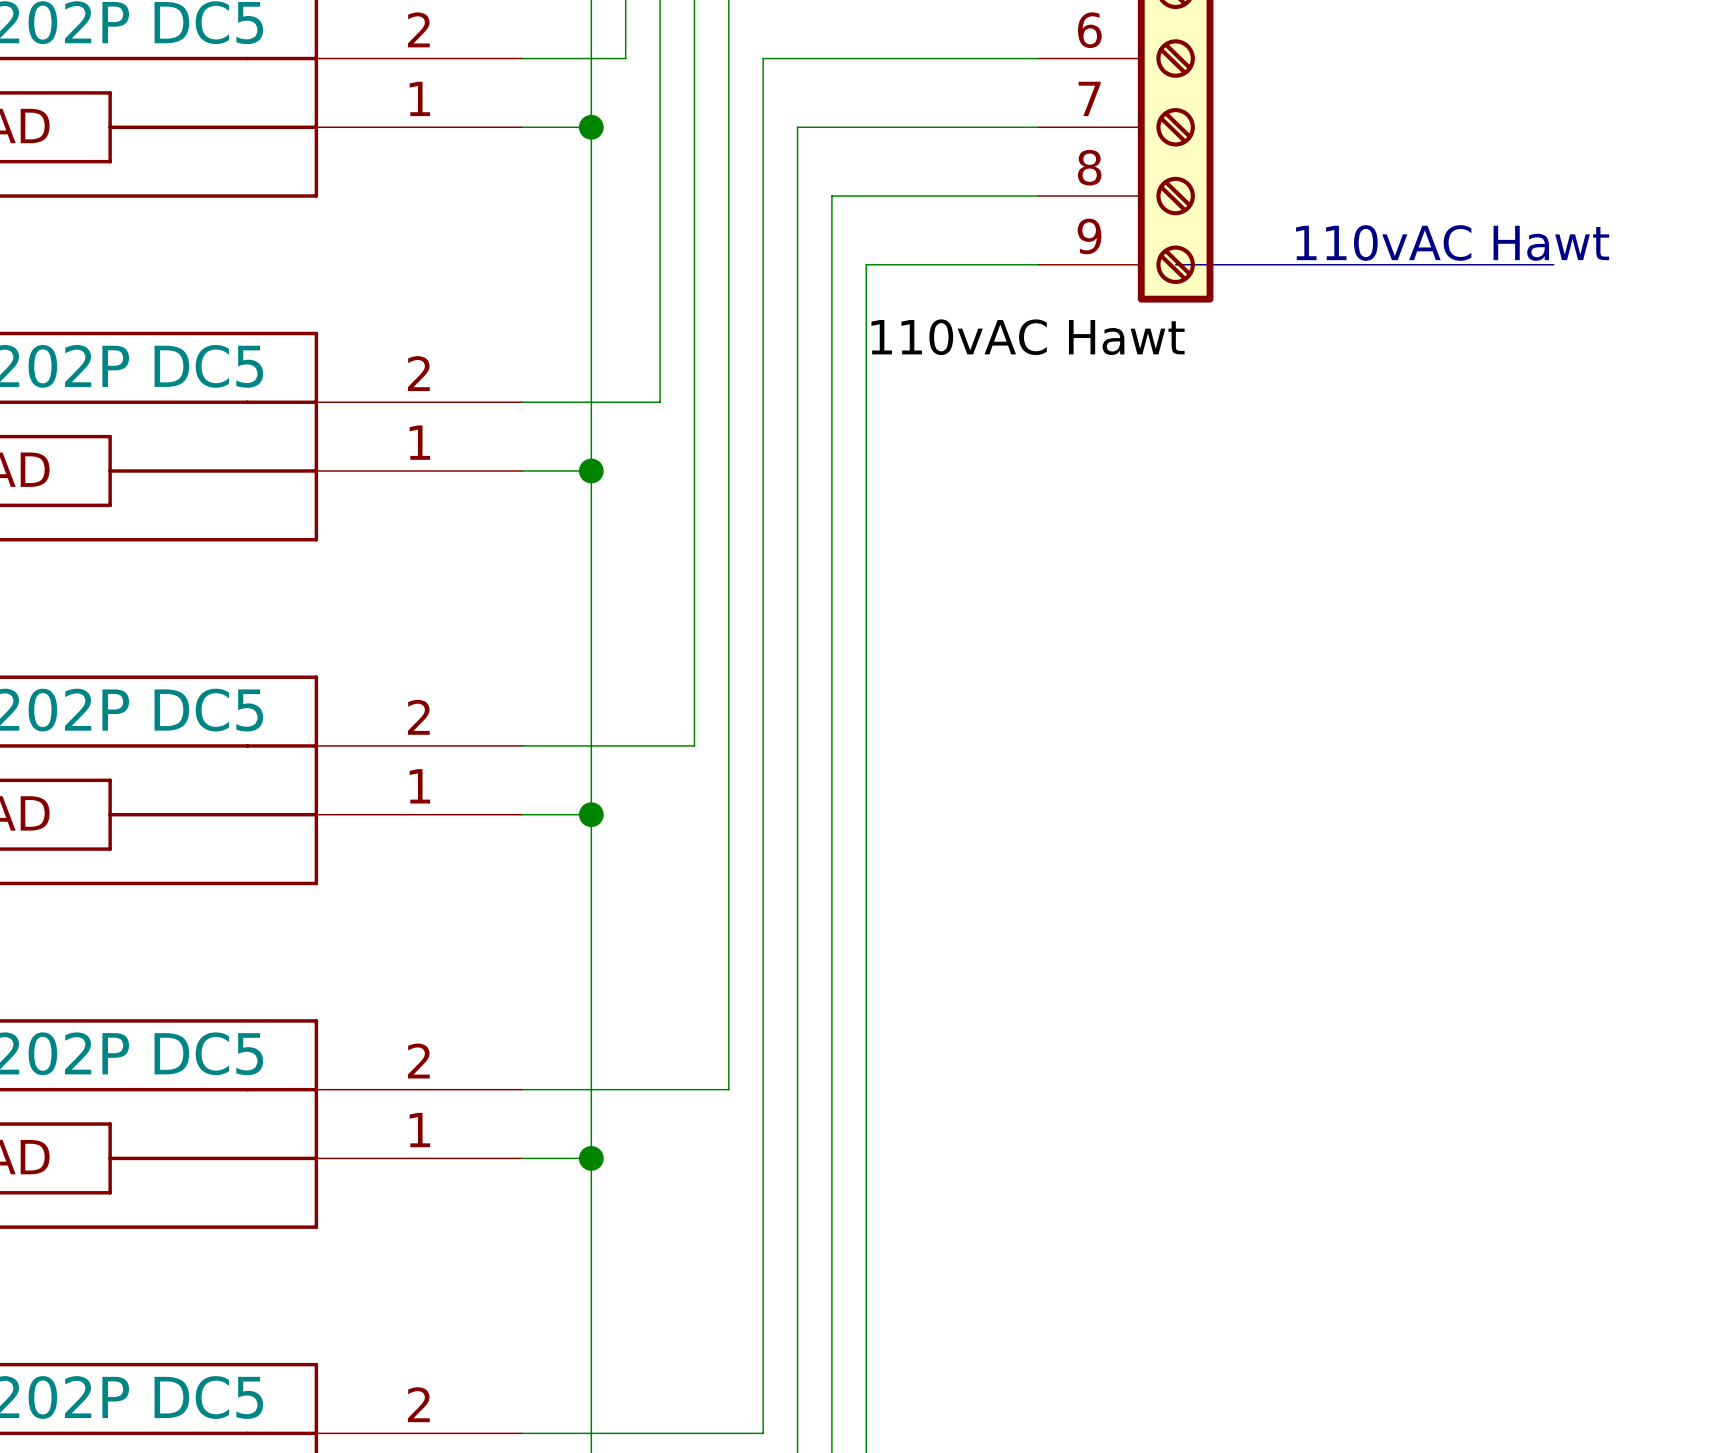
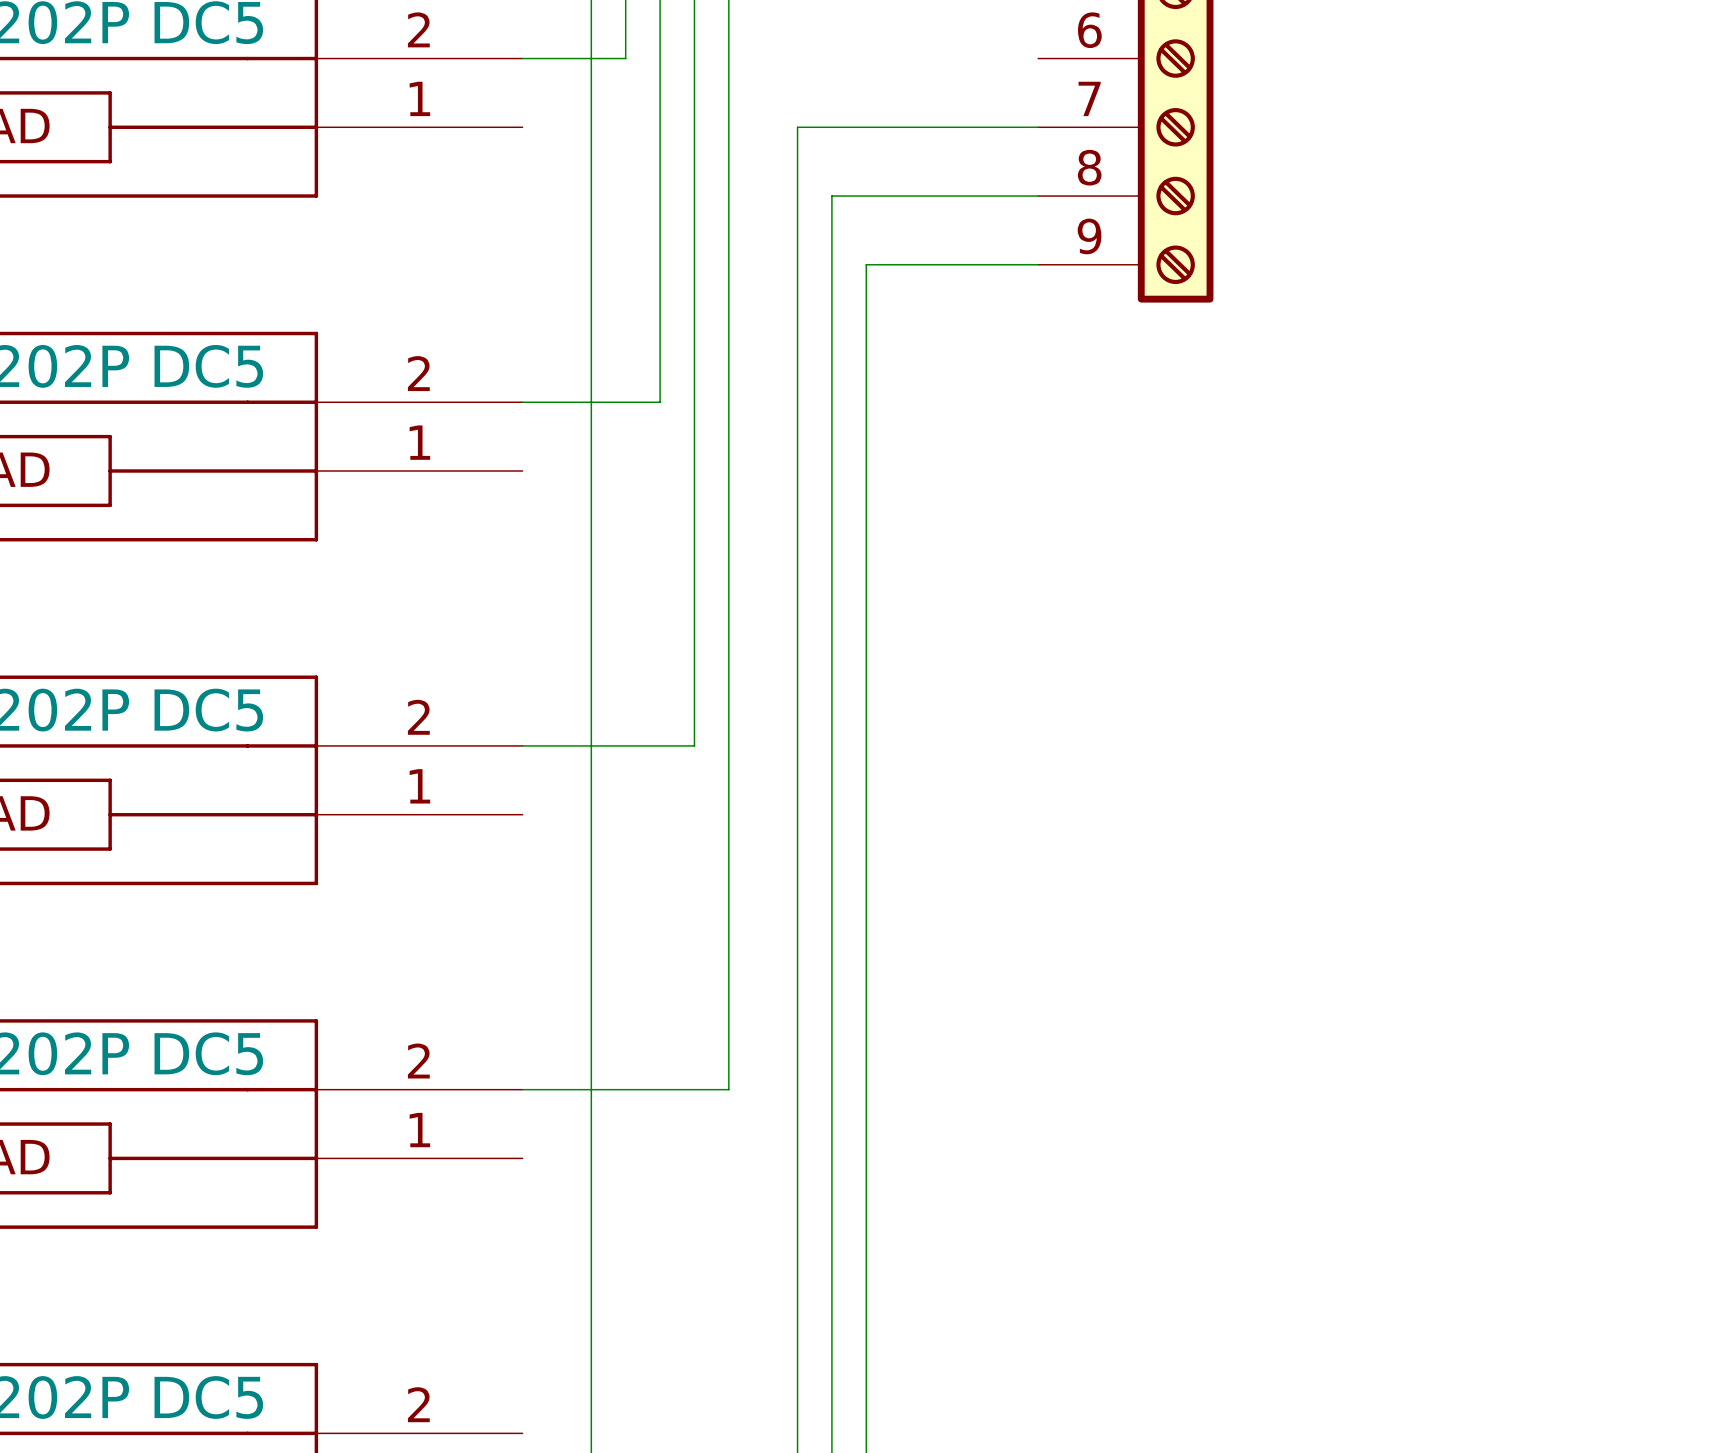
wire: (1038, 58) (763, 58) (763, 1433) (522, 1433) -> none
wire: (522, 127) (591, 127) -> none
junction: (591, 127) -> none
text: 110vAC Hawt (1452, 242) -> none
line: (1175, 264) (1553, 264) -> none
label: 110vAC Hawt (1028, 337) -> none
wire: (522, 470) (591, 470) -> none
junction: (591, 470) -> none
wire: (522, 814) (591, 814) -> none
junction: (591, 814) -> none
wire: (522, 1158) (591, 1158) -> none
junction: (591, 1158) -> none

